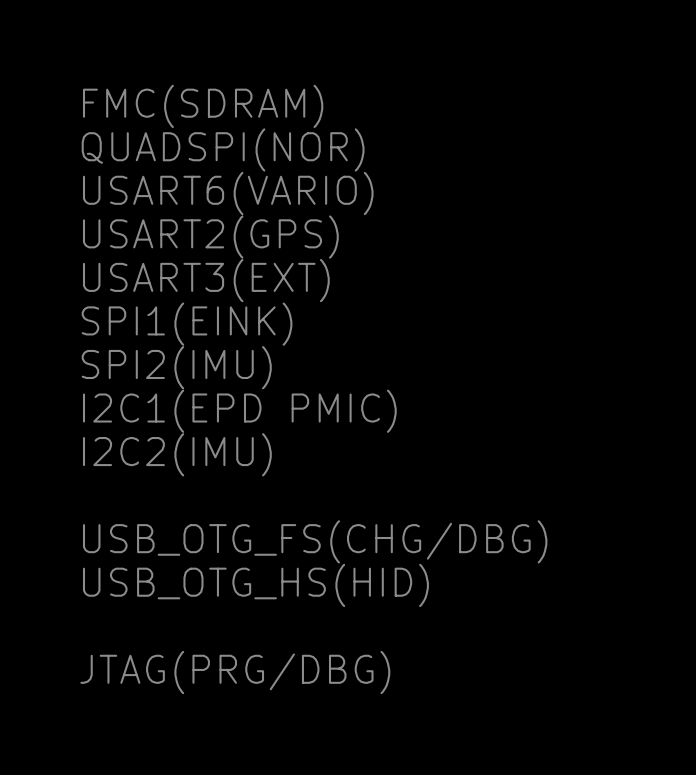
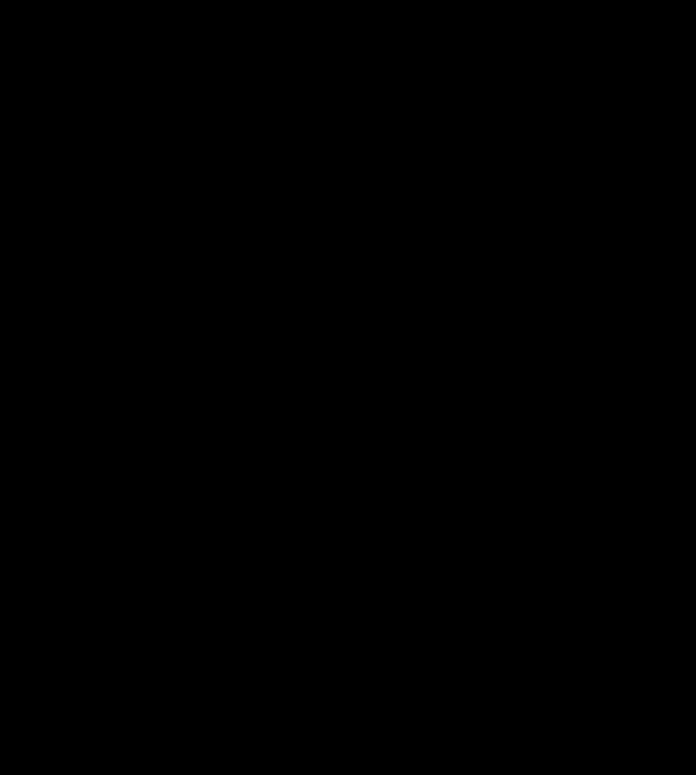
text: FMC(SDRAM) (203, 106) -> none
text: QUADSPI(NOR) (223, 149) -> none
text: USART6(VARIO) (228, 193) -> none
text: USART2(GPS) (210, 237) -> none
text: USART3(EXT) (206, 280) -> none
text: SPI1(EINK) (187, 324) -> none
text: SPI2(IMU) (176, 367) -> none
text: I2C1(EPD PMIC) (239, 411) -> none
text: I2C2(IMU) (177, 454) -> none
text: USB_OTG_FS(CHG/DBG) (315, 541) -> none
text: USB_OTG_HS(HID) (255, 585) -> none
text: JTAG(PRG/DBG) (235, 672) -> none

